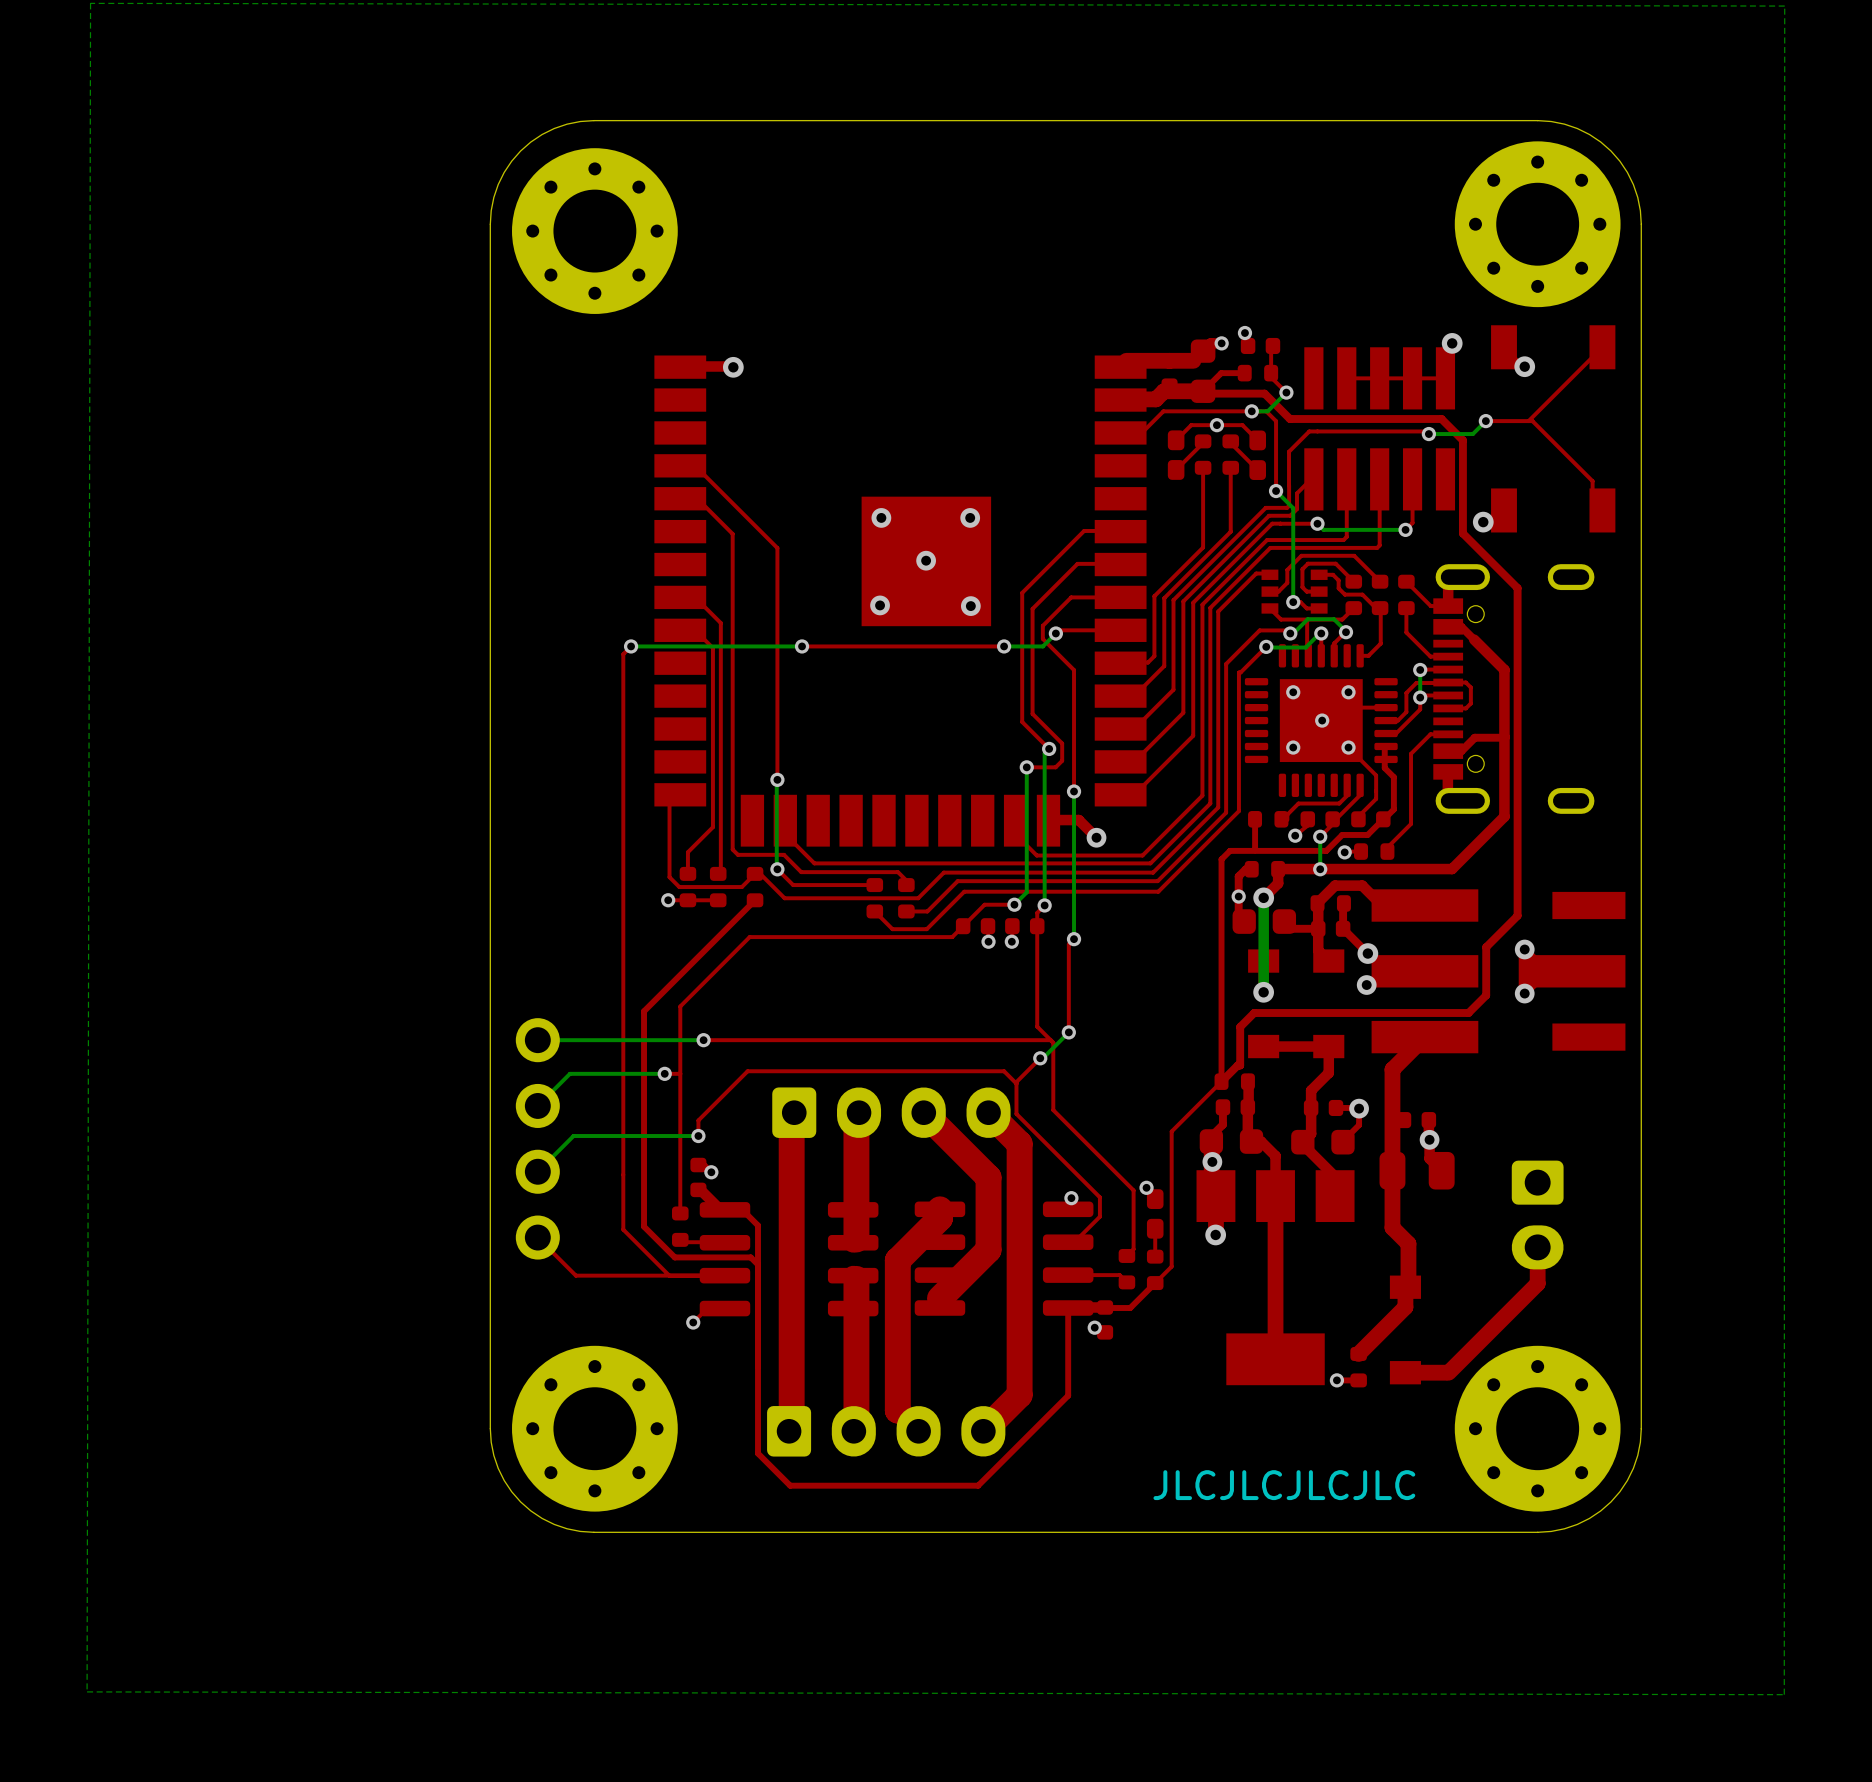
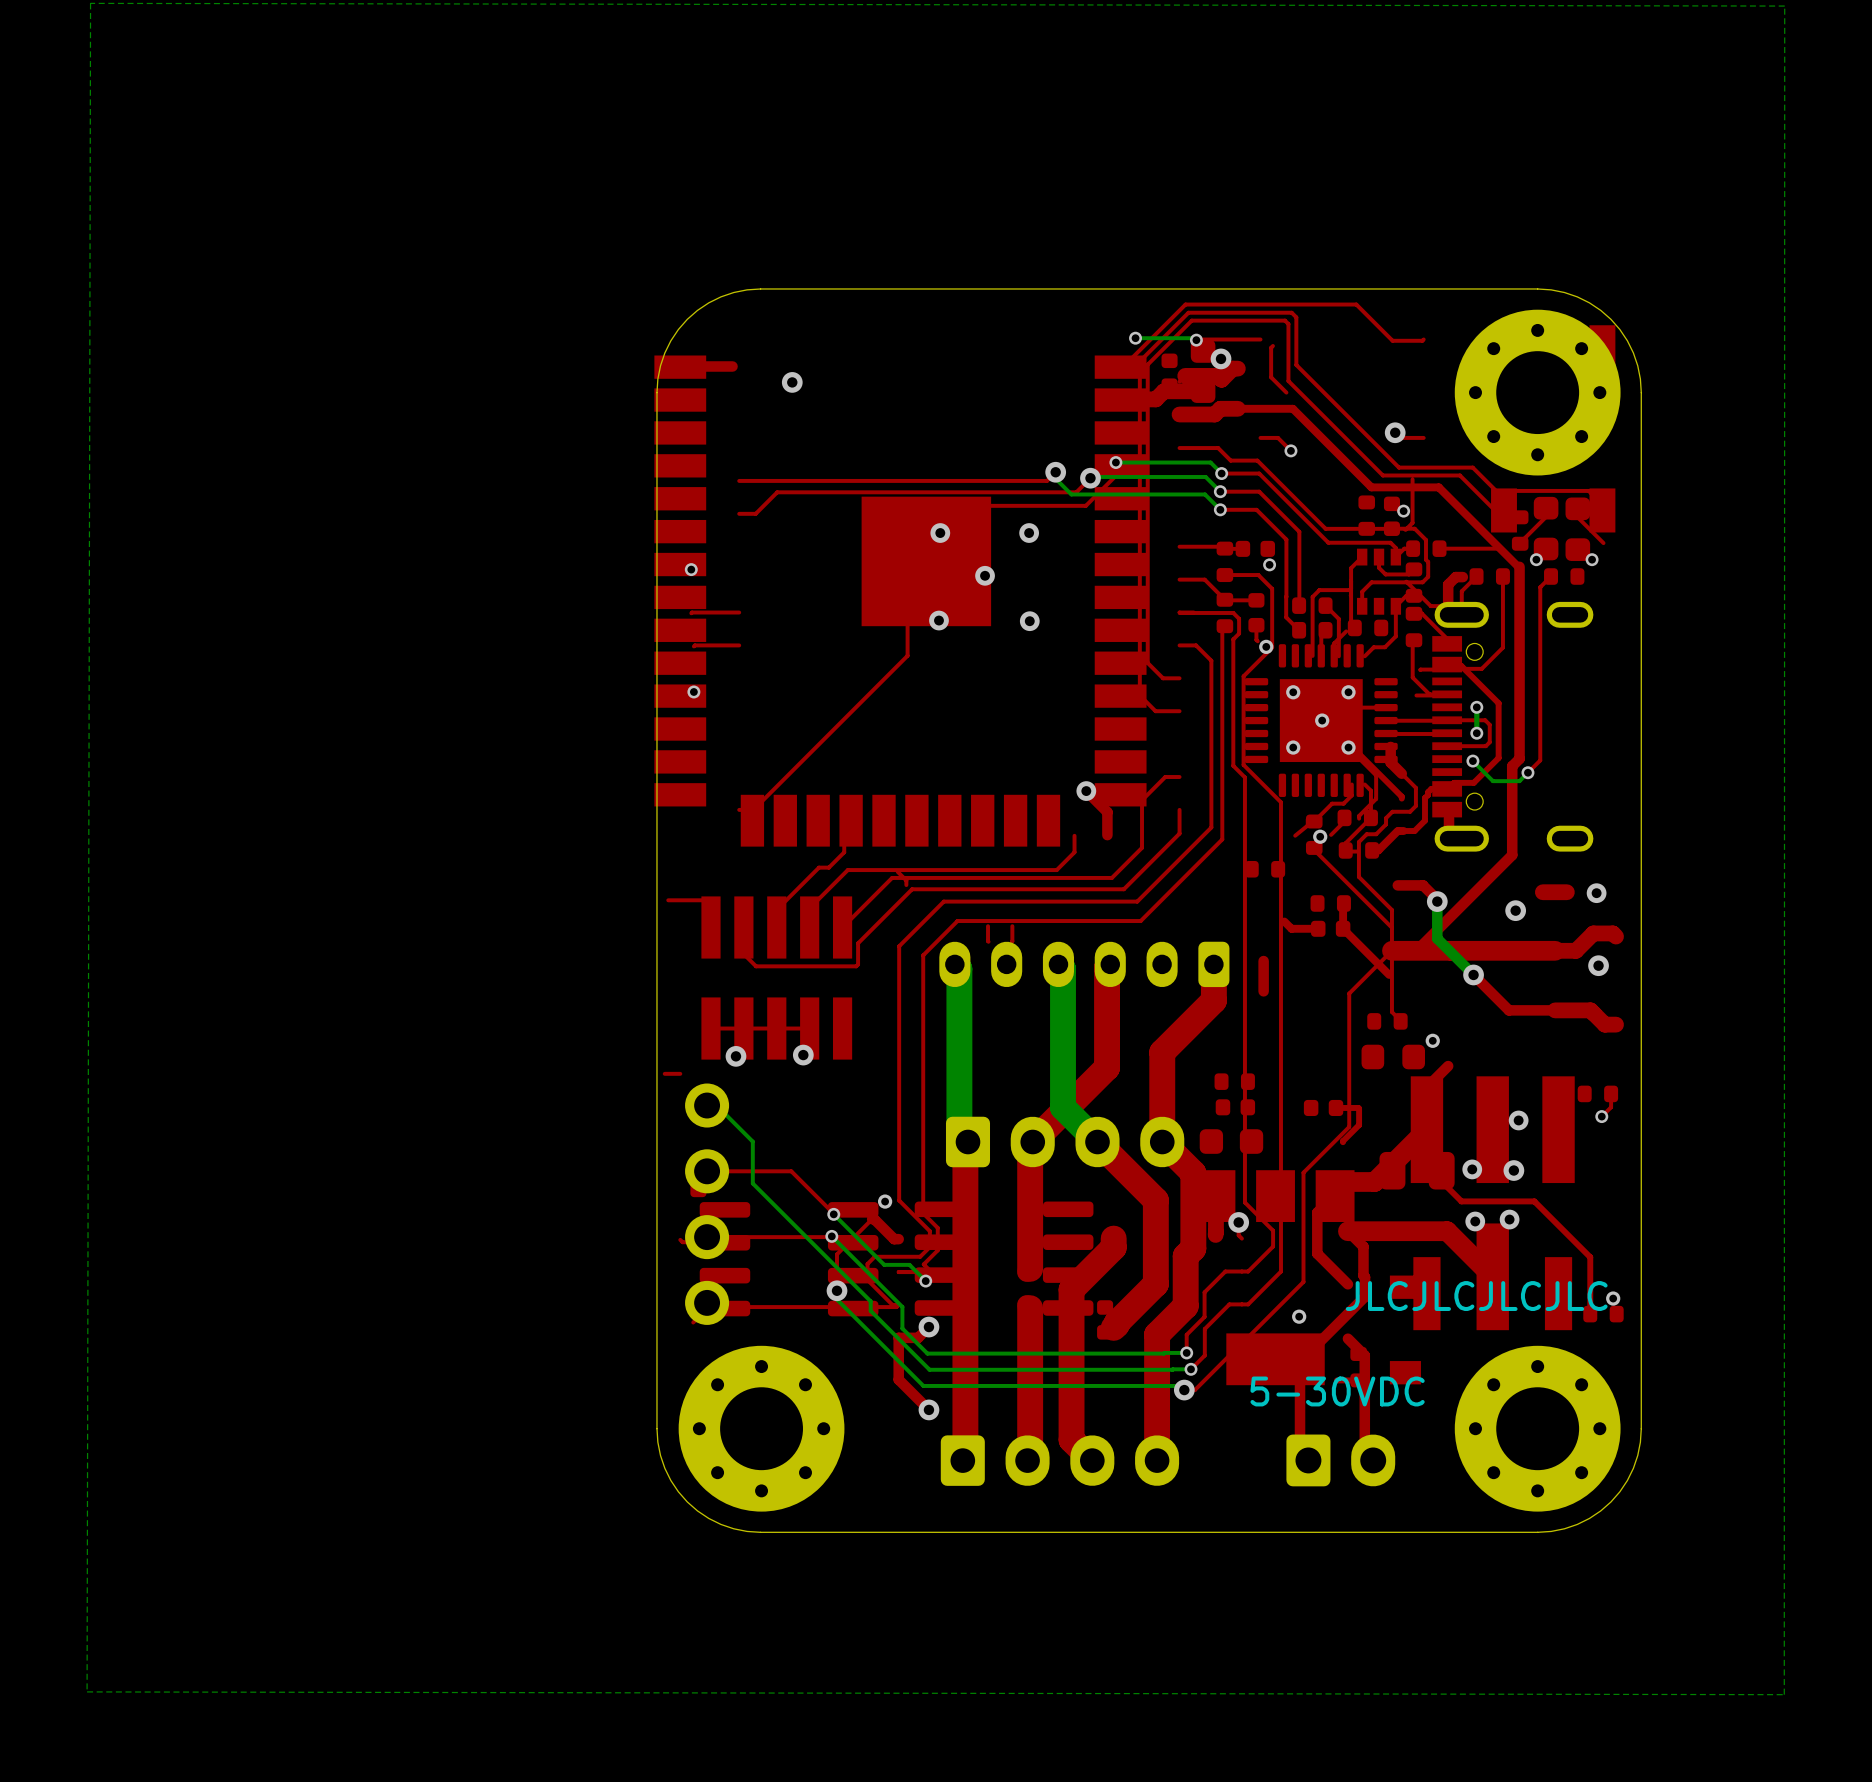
part position: (1537, 224) -> (1537, 392)
part: (594, 231) -> none
via: (1244, 333) -> none
bottom track: none -> (1135, 338) (1194, 338) (1196, 340)
via: none -> (1135, 338)
top track: none -> (1260, 339) (1196, 340)
top track: none -> (1423, 339) (1392, 340) (1356, 304) (1185, 304) (1131, 358)
via: none -> (1196, 340)
top track: (1221, 343) (1210, 343) (1193, 360) (1126, 360) (1120, 366) -> none
via position: (1221, 343) -> (1221, 358)
via: (1452, 343) -> none
part: (1260, 345) -> none
top track: (1602, 347) (1528, 421) -> none
top track: none -> (1221, 358) (1230, 368) (1237, 368) (1232, 368) (1221, 379) (1217, 375) (1185, 375) (1179, 381)
via: (1524, 366) -> none
via position: (733, 367) -> (792, 382)
top track: (1244, 373) (1221, 373) (1203, 391) -> none
part: (1257, 373) -> none
top track: (1445, 378) (1346, 378) -> none
top track: (1203, 391) (1205, 393) (1264, 393) (1289, 418) (1441, 418) (1462, 440) (1462, 533) (1517, 588) (1517, 915) (1486, 947) (1486, 995) (1468, 1013) (1254, 1013) (1240, 1026) (1240, 1065) (1237, 1065) (1171, 1131) (1171, 1266) (1130, 1308) (1068, 1308) (1068, 1395) (978, 1485) (790, 1485) (758, 1453) (758, 1225) (742, 1209) (720, 1209) (698, 1189) -> none
bottom track: (1286, 392) (1267, 411) (1251, 411) -> none
via: (1286, 392) -> none
board edge: (1641, 392) (1641, 224) (1637, 197) (1627, 172) (1610, 150) (1589, 134) (1564, 124) (1537, 120) (593, 120) (567, 124) (542, 134) (520, 150) (511, 161) (498, 184) (493, 197) (490, 224) (491, 1442) (498, 1468) (511, 1491) (530, 1510) (554, 1524) (567, 1528) (593, 1532) (760, 1532) -> (1641, 392) (1640, 379) (1633, 352) (1619, 329) (1610, 319) (1589, 302) (1577, 296) (1564, 292) (1537, 288) (760, 288) (733, 292) (708, 302) (687, 319) (678, 329) (664, 352) (660, 365) (656, 392) (657, 1442) (660, 1455) (670, 1480) (687, 1501) (708, 1518) (720, 1524) (747, 1531) (760, 1532)
via: (1251, 411) -> none
top track: none -> (1179, 414) (1214, 414) (1220, 408) (1292, 408) (1371, 487) (1438, 487) (1519, 566) (1519, 758) (1512, 766) (1512, 855) (1416, 950) (1391, 950)
top track: (1485, 421) (1532, 421) (1592, 481) (1592, 515) -> none
bottom track: (1485, 421) (1472, 434) (1428, 434) -> none
via: (1485, 421) -> none
via: (1216, 425) -> none
part: (1379, 428) -> none
top track: (1140, 432) (1142, 432) (1163, 411) (1266, 411) (1276, 421) (1276, 491) -> none
top track: none -> (1395, 432) (1400, 437) (1423, 437)
via: none -> (1395, 432)
top track: (1428, 434) (1426, 431) (1309, 431) (1289, 451) (1289, 505) (1287, 507) (1265, 507) (1173, 600) (1173, 689) (1134, 728) (1120, 728) -> none
via: (1428, 434) -> none
top track: none -> (1260, 437) (1278, 437) (1290, 450)
top track: (1176, 440) (1191, 425) (1242, 425) (1257, 440) -> none
top track: (1203, 441) (1176, 469) -> none
top track: (1230, 441) (1257, 470) -> none
top track: none -> (1179, 448) (1218, 448) (1230, 460) (1257, 460) (1325, 528) (1414, 528) (1425, 539) (1428, 576) (1422, 582) (1371, 582) (1362, 591) (1362, 606)
via: none -> (1290, 450)
part: (1203, 454) -> none
part: (1230, 454) -> none
part: (1176, 455) -> none
part: (1257, 455) -> none
top track: none -> (1115, 462) (1115, 475) (1085, 505) (917, 505) (907, 515) (907, 655) (753, 809) (739, 809)
bottom track: none -> (1115, 462) (1210, 462) (1221, 473)
via: none -> (1115, 462)
top track: (680, 465) (694, 465) (777, 548) (777, 779) -> none
top track: (1203, 467) (1203, 547) (1154, 596) (1154, 656) (1148, 662) (1120, 662) -> none
top track: (1230, 467) (1230, 531) (1164, 598) (1164, 666) (1134, 695) (1120, 695) -> none
top track: none -> (1055, 472) (1047, 480) (739, 480)
bottom track: none -> (1055, 472) (1055, 478) (1071, 494) (1205, 494) (1220, 509)
via: none -> (1055, 472)
top track: none -> (1221, 473) (1259, 473) (1328, 542) (1390, 542) (1395, 548) (1395, 557) (1404, 548) (1413, 548)
via: none -> (1221, 473)
top track: none -> (1090, 478) (1076, 492) (777, 492) (755, 513) (739, 513)
bottom track: none -> (1090, 478) (1205, 476) (1220, 491)
via: none -> (1090, 478)
top track: (1313, 479) (1311, 479) (1296, 493) (1296, 509) (1290, 515) (1269, 515) (1183, 601) (1183, 712) (1134, 761) (1120, 761) -> none
top track: (1346, 479) (1346, 536) (1343, 540) (1267, 540) (1202, 604) (1202, 795) (1142, 855) (1036, 855) (1015, 834) (1015, 820) -> none
top track: (1379, 479) (1379, 545) (1377, 547) (1270, 547) (1210, 607) (1210, 803) (1150, 863) (814, 863) (785, 834) (785, 820) -> none
top track: none -> (1220, 491) (1259, 491) (1299, 531) (1299, 605)
via: none -> (1220, 491)
bottom track: (1276, 491) (1293, 508) (1293, 602) -> none
via: (1276, 491) -> none
top track: (680, 498) (696, 498) (732, 533) (732, 849) (737, 854) (784, 854) (801, 872) (897, 872) -> none
top track: none -> (1577, 508) (1577, 517) (1603, 543)
top track: none -> (1220, 509) (1256, 509) (1286, 539) (1286, 596)
via: none -> (1220, 509)
via: none -> (1403, 511)
top track: none -> (1552, 514) (1548, 514) (1525, 537) (1525, 541)
part: none -> (1366, 515)
part: none -> (1391, 516)
top track: none -> (1603, 516) (1596, 509) (1596, 498) (1588, 490) (1496, 490) (1472, 467) (1398, 467) (1296, 364) (1296, 317) (1291, 312) (1188, 312) (1139, 361) (1139, 695) (1155, 711) (1179, 711)
via: (881, 517) -> none
via: (970, 517) -> none
top track: none -> (1520, 517) (1501, 517) (1459, 475) (1382, 475) (1288, 381) (1288, 324) (1285, 320) (1191, 320) (1147, 364) (1147, 663) (1163, 678) (1179, 678)
via: (1483, 522) -> none
top track: (1317, 523) (1272, 523) (1193, 602) (1193, 735) (1134, 794) (1120, 794) -> none
bottom track: (1317, 523) (1323, 529) (1405, 529) -> none
via: (1317, 523) -> none
part: none -> (1546, 528)
via: (1405, 529) -> none
part: none -> (1577, 529)
top track: (1120, 530) (1084, 530) (1022, 592) (1022, 721) (1049, 748) -> none
part: none -> (1520, 530)
via: none -> (940, 533)
via: none -> (1029, 533)
top track: none -> (1179, 546) (1242, 548)
part: none -> (1255, 548)
part: none -> (1426, 548)
top track: none -> (1439, 548) (1501, 548)
top track: none -> (1362, 557) (1351, 568) (1351, 624) (1354, 627)
top track: none -> (1379, 557) (1379, 567) (1385, 574) (1408, 574) (1413, 569)
via: none -> (1536, 559)
via: none -> (1592, 559)
via: (926, 560) -> none
part: none -> (1224, 561)
top track: (1120, 563) (1077, 563) (1032, 608) (1032, 713) (1062, 743) (1062, 760) (1055, 767) (1026, 767) -> none
via: none -> (1269, 564)
via: none -> (691, 569)
top track: (1268, 573) (1256, 573) (1218, 611) (1218, 807) (1153, 872) (943, 872) (918, 898) (784, 898) (760, 873) (755, 873) (741, 887) (679, 887) (669, 877) (669, 804) (680, 794) -> none
top track: (1319, 574) (1332, 574) (1338, 580) (1338, 588) (1344, 594) (1362, 594) (1375, 608) (1380, 608) (1380, 643) (1368, 655) (1360, 655) -> none
part footprint: [1371, 574, 1389, 616] -> [1357, 548, 1402, 615]
via: none -> (985, 575)
top track: none -> (1224, 575) (1258, 575) (1272, 588) (1272, 647) (1243, 676) (1243, 764) (1280, 802) (1280, 1271) (1248, 1304) (1229, 1304) (1204, 1328) (1204, 1355) (1191, 1369)
top track: none -> (1476, 576) (1461, 591) (1461, 614)
part: none -> (1489, 576)
top track: none -> (1502, 576) (1502, 647) (1481, 668) (1451, 668) (1447, 664)
top track: none -> (1551, 576) (1540, 587) (1540, 760) (1527, 772)
part: none -> (1564, 576)
top track: none -> (1179, 579) (1204, 579) (1225, 600) (1256, 600)
top track: (1353, 581) (1335, 563) (1308, 563) (1302, 569) (1302, 587) (1306, 591) (1319, 591) -> none
top track: (1380, 581) (1354, 555) (1301, 555) (1287, 569) (1287, 582) (1278, 591) (1269, 591) -> none
top track: none -> (1351, 588) (1319, 590) (1312, 596) (1312, 655)
part: (1294, 591) -> none
part: (1353, 594) -> none
part position: (1406, 594) -> (1413, 582)
top track: none -> (1413, 595) (1406, 595) (1395, 606) (1395, 636) (1384, 647) (1373, 647) (1364, 656)
top track: (680, 596) (694, 596) (720, 623) (720, 871) (718, 873) -> none
top track: none -> (1286, 596) (1286, 617) (1299, 630)
top track: (1120, 597) (1071, 597) (1042, 625) (1042, 638) (1074, 670) (1074, 791) -> none
top track: (1293, 602) (1300, 602) (1306, 608) (1319, 608) -> none
via: (1293, 602) -> none
via: (880, 605) -> none
part: none -> (1312, 605)
top track: none -> (1325, 605) (1338, 618) (1338, 656)
via: (970, 606) -> none
top track: (1353, 608) (1342, 619) (1281, 619) (1269, 608) -> none
top track: (1406, 608) (1406, 632) (1430, 656) (1448, 656) -> none
top track: none -> (739, 612) (691, 613)
top track: none -> (1193, 612) (1179, 612) (1233, 612) (1239, 618) (1239, 633) (1233, 639) (1233, 765) (1244, 777) (1244, 1202) (1273, 1230) (1273, 1246) (1248, 1271) (1225, 1271) (1204, 1292) (1204, 1316) (1186, 1334) (1186, 1352)
part: none -> (1224, 612)
part: none -> (1256, 612)
top track: none -> (1409, 613) (1421, 613) (1447, 638) (1447, 643)
via: none -> (938, 620)
via: none -> (1029, 621)
top track: (1307, 621) (1308, 655) -> none
top track: none -> (1256, 625) (1257, 641)
top track: none -> (1224, 626) (1222, 628) (1222, 839) (1140, 921) (957, 921) (923, 955) (923, 1213) (937, 1227) (937, 1250) (923, 1264) (931, 1272) (898, 1272)
top track: (1448, 626) (1461, 626) (1504, 669) (1504, 816) (1452, 869) (1281, 869) -> none
part: none -> (1368, 627)
part: none -> (1413, 627)
top track: (680, 629) (694, 629) (712, 648) (712, 827) (687, 852) (687, 873) -> none
top track: (1120, 630) (1059, 630) (1055, 633) -> none
top track: (1291, 630) (1259, 630) (1226, 663) (1226, 812) (1211, 827) -> (1179, 645) (1196, 645) (1211, 660) (1211, 827)
part: none -> (1312, 630)
bottom track: (1346, 631) (1334, 619) (1307, 619) (1294, 632) (1291, 632) -> none
bottom track: (1321, 632) (1305, 647) (1266, 646) -> none
via: (1345, 632) -> none
bottom track: (1055, 633) (1042, 646) (1004, 646) -> none
via: (1055, 633) -> none
via: (1290, 633) -> none
via: (1321, 633) -> none
top track: none -> (1408, 640) (1412, 644) (1412, 677) (1429, 694) (1447, 694)
top track: none -> (739, 645) (693, 646)
top track: (631, 646) (623, 654) (623, 1229) (669, 1275) -> none
via: (631, 646) -> none
bottom track: (802, 646) (631, 646) -> none
via: (802, 646) -> none
top track: (1004, 646) (802, 646) -> none
via: (1004, 646) -> none
top track: (1266, 646) (1238, 672) (1238, 811) (1158, 891) (964, 891) (926, 929) (892, 929) (874, 911) -> none
top track: none -> (1449, 665) (1461, 665) (1498, 703) (1498, 758) (1473, 782) (1454, 782) (1448, 788)
bottom track: (1420, 669) (1420, 697) -> none
via: (1420, 669) -> none
top track: (1448, 682) (1465, 682) (1470, 687) (1470, 703) (1465, 708) (1448, 708) -> none
top track: (1453, 683) (1416, 683) (1406, 692) (1406, 712) (1397, 720) (1386, 720) -> none
part position: (1513, 688) -> (1512, 726)
via: none -> (693, 691)
top track: (1420, 697) (1420, 709) (1396, 733) (1386, 733) -> none
via: (1420, 697) -> none
bottom track: none -> (1476, 707) (1476, 733)
via: none -> (1476, 707)
top track: none -> (1447, 720) (1485, 720) (1489, 724) (1489, 742) (1485, 746) (1447, 746)
top track: none -> (1457, 720) (1390, 720)
via: none -> (1476, 733)
top track: (1448, 734) (1430, 734) (1411, 753) (1411, 823) (1383, 851) -> none
top track: none -> (1452, 734) (1390, 734)
top track: (1504, 737) (1474, 737) (1461, 751) (1448, 751) -> none
top track: (1384, 746) (1384, 768) (1393, 777) (1393, 809) (1384, 819) -> none
top track: none -> (1390, 746) (1390, 762) (1415, 787) (1415, 805) (1410, 811) (1392, 811) (1386, 818) (1386, 824) (1376, 834) (1366, 834) (1358, 842) (1358, 876) (1391, 910) (1391, 1012) (1400, 1020)
bottom track: (1049, 748) (1044, 753) (1044, 905) -> none
via: (1049, 748) -> none
top track: none -> (1353, 748) (1401, 798)
bottom track: none -> (1472, 761) (1492, 781) (1519, 781) (1527, 772)
via: none -> (1472, 761)
bottom track: (1026, 767) (1026, 892) (1014, 904) -> none
via: (1026, 767) -> none
via: none -> (1527, 772)
top track: none -> (1179, 777) (1165, 777) (1142, 800) (1142, 847) (1111, 877) (892, 877) (842, 927)
bottom track: (777, 779) (777, 869) -> none
via: (777, 779) -> none
top track: (1447, 779) (1447, 791) -> (1449, 818) (1449, 830)
top track: (1347, 784) (1347, 795) (1339, 803) (1298, 803) (1287, 814) (1287, 819) -> none
top track: none -> (1351, 784) (1351, 795) (1343, 803) (1332, 803) (1314, 821)
top track: (1360, 784) (1360, 795) (1336, 819) (1332, 819) (1332, 824) (1320, 836) -> none
top track: none -> (1364, 784) (1370, 790) (1370, 817) (1345, 843) (1345, 850)
top track: none -> (1447, 788) (1431, 788) (1428, 792) (1424, 798) (1424, 820) (1414, 831) (1398, 831)
bottom track: (1074, 791) (1074, 939) -> none
via: (1074, 791) -> none
top track: none -> (1086, 791) (1107, 812) (1107, 835)
top track: none -> (1179, 809) (1179, 833) (1123, 889) (912, 889) (858, 943) (858, 964) (856, 966) (756, 966) (743, 954)
part footprint: [1300, 811, 1340, 828] -> [1305, 814, 1323, 855]
part footprint: [1351, 811, 1391, 828] -> [1337, 809, 1378, 827]
top track: none -> (1344, 817) (1344, 821) (1331, 834)
top track: (1255, 819) (1255, 850) -> none
part: (1268, 819) -> none
top track: (1383, 819) (1367, 834) (1342, 834) (1326, 850) (1230, 850) (1221, 859) (1221, 1081) -> none
top track: (1048, 820) (1078, 820) (1096, 837) -> none
top track: none -> (1397, 831) (1378, 850) (1372, 850)
top track: none -> (844, 835) (844, 852) (828, 867) (818, 867) (776, 909) (776, 927)
top track: none -> (1074, 835) (1074, 852) (1056, 870) (847, 870) (809, 908) (809, 927)
via: (1295, 835) -> none
bottom track: (1320, 836) (1320, 869) -> none
via position: (1096, 837) -> (1086, 791)
top track: none -> (1314, 847) (1391, 927)
part position: (1374, 851) -> (1358, 850)
via: (1344, 852) -> none
top track: (777, 869) (793, 885) (874, 885) -> none
via: (777, 869) -> none
top track: (1251, 869) (1245, 869) (1238, 876) (1238, 916) (1244, 921) -> none
top track: (1278, 869) (1278, 883) (1263, 897) -> none
via: (1320, 869) -> none
top track: (1157, 881) (957, 881) (927, 911) (906, 911) -> (1157, 881) (1137, 901) (943, 901) (899, 946) (899, 1200) (929, 1231) (929, 1247) (920, 1256) (874, 1256) (867, 1263) (867, 1280) (892, 1304) (898, 1304) (896, 1307) (711, 1307) (707, 1302)
top track: none -> (1397, 885) (1423, 885) (1437, 901)
part: (687, 887) -> none
part: (718, 887) -> none
part: (755, 887) -> none
top track: none -> (1566, 892) (1542, 892)
via: none -> (1596, 893)
via: (1238, 896) -> none
bottom track: (1263, 897) (1263, 991) -> none
via: (1263, 897) -> none
part: (874, 898) -> none
part: (906, 898) -> none
via: (668, 900) -> none
top track: (755, 900) (644, 1011) (644, 1226) (674, 1257) (750, 1257) (758, 1264) -> none
bottom track: none -> (1437, 901) (1437, 938) (1473, 974)
via: none -> (1437, 901)
top track: (1014, 904) (984, 904) (952, 937) (749, 937) (680, 1006) (680, 1213) -> none
via: (1014, 904) -> none
top track: (1044, 905) (1037, 912) (1037, 1026) (1053, 1042) (1053, 1110) (1133, 1190) (1133, 1249) (1126, 1255) -> none
via: (1044, 905) -> none
top track: (1424, 905) (1382, 905) (1362, 885) (1335, 885) (1317, 903) (1318, 950) (1328, 961) -> none
via: none -> (1515, 910)
part: (1264, 921) -> none
part: (975, 926) -> none
part: (1024, 926) -> none
top track: none -> (1616, 936) (1612, 933) (1593, 933) (1576, 950) (1391, 950)
top track: (1074, 939) (1068, 944) (1068, 1032) -> none
via: (1074, 939) -> none
via: (988, 941) -> none
via: (1011, 941) -> none
via: (1524, 949) -> none
top track: none -> (1391, 950) (1349, 993) (1349, 1126) (1303, 1172) (1303, 1281) (1248, 1337) (1241, 1337) (1241, 1343) (1194, 1390) (1184, 1390)
via: (1367, 953) -> none
bottom track: none -> (954, 964) (959, 968) (959, 1133) (967, 1142)
bottom track: none -> (1058, 964) (1063, 968) (1063, 1107) (1097, 1142)
part: none -> (1084, 964)
top track: none -> (1110, 964) (1107, 967) (1107, 1067) (1032, 1142)
top track: none -> (1213, 964) (1213, 1000) (1162, 1052) (1162, 1142) (1193, 1173) (1193, 1248) (1185, 1256) (1185, 1306) (1157, 1334) (1157, 1460)
via: none -> (1598, 965)
part rotation: 0° (1498, 971) -> 90° clockwise (1492, 1203)
part position: (1498, 971) -> (1492, 1203)
top track: none -> (1473, 974) (1508, 1010) (1590, 1010) (1604, 1024) (1616, 1024)
via: none -> (1473, 974)
part: none -> (776, 978)
via: (1366, 985) -> none
via: (1263, 992) -> none
via: (1524, 993) -> none
part: (1263, 1003) -> none
part: (1328, 1003) -> none
part: none -> (1387, 1021)
top track: none -> (809, 1028) (710, 1028)
bottom track: (1068, 1032) (1042, 1058) (1040, 1058) -> none
via: (1068, 1032) -> none
top track: (1424, 1037) (1392, 1069) (1392, 1227) (1408, 1243) (1408, 1287) -> none
bottom track: (703, 1040) (537, 1040) -> none
via: (703, 1040) -> none
top track: (1050, 1040) (703, 1040) -> none
via: none -> (1432, 1040)
top track: (1263, 1046) (1328, 1046) (1328, 1072) (1311, 1090) (1311, 1133) (1302, 1144) (1335, 1176) (1335, 1196) -> none
via: none -> (803, 1055)
via: none -> (735, 1056)
part: none -> (1393, 1057)
top track: (1040, 1058) (1016, 1082) (1016, 1113) (1099, 1197) (1099, 1216) (1074, 1242) (1068, 1242) -> none
via: (1040, 1058) -> none
top track: none -> (1448, 1066) (1426, 1087) (1426, 1129) (1374, 1181) (1347, 1181) (1317, 1212) (1317, 1253) (1347, 1284)
bottom track: (664, 1073) (569, 1073) (537, 1105) -> none
via: (664, 1073) -> none
top track: (1248, 1079) (1247, 1137) (1251, 1141) (1261, 1141) (1275, 1156) (1275, 1359) -> none
top track: (1016, 1083) (1004, 1071) (747, 1071) (698, 1120) (698, 1136) -> none
part: none -> (1597, 1093)
top track: none -> (1611, 1093) (1611, 1107) (1601, 1116)
bottom track: none -> (707, 1105) (716, 1105) (752, 1141) (752, 1183) (870, 1301) (870, 1310) (929, 1369) (1191, 1369)
top track: (1222, 1107) (1222, 1124) (1213, 1134) -> none
via: (1359, 1108) -> none
top track: (794, 1112) (791, 1115) (791, 1428) (789, 1431) -> (967, 1142) (965, 1144) (965, 1458) (962, 1460)
part: (891, 1112) -> none
top track: (923, 1112) (988, 1177) (988, 1249) (939, 1298) -> none
top track: (988, 1112) (1019, 1143) (1019, 1395) (983, 1431) -> none
top track: (856, 1115) (856, 1239) (853, 1242) -> (1030, 1144) (1030, 1268) (1026, 1272)
via: none -> (1601, 1116)
part: (1416, 1120) -> none
via: none -> (1518, 1120)
bottom track: (698, 1136) (573, 1136) (537, 1171) -> none
via: (698, 1136) -> none
part position: (537, 1138) -> (707, 1204)
via: (1429, 1139) -> none
part: none -> (1065, 1142)
top track: none -> (1097, 1142) (1155, 1200) (1155, 1284) (1113, 1327)
part: (1322, 1142) -> none
via: (1212, 1161) -> none
top track: none -> (1426, 1166) (1461, 1201) (1534, 1201) (1590, 1257) (1590, 1314)
via: none -> (1472, 1169)
via: none -> (1513, 1170)
top track: none -> (707, 1171) (791, 1171) (833, 1214)
via: (711, 1172) -> none
via: (1146, 1187) -> none
via: (1071, 1198) -> none
via: none -> (885, 1201)
top track: (939, 1209) (939, 1218) (897, 1260) (897, 1410) (918, 1431) -> (1113, 1238) (1113, 1247) (1071, 1289) (1071, 1439) (1092, 1460)
part: (1155, 1213) -> none
bottom track: none -> (833, 1214) (884, 1264) (909, 1264) (925, 1281)
via: none -> (833, 1214)
part rotation: 0° (1537, 1215) -> 90° counterclockwise (1340, 1460)
part position: (1537, 1215) -> (1340, 1460)
via: none -> (1509, 1219)
via: none -> (1475, 1221)
top track: none -> (1238, 1222) (1238, 1235) (1241, 1238)
part: (680, 1226) -> none
via position: (1215, 1234) -> (1238, 1222)
top track: none -> (831, 1236) (707, 1237)
bottom track: none -> (831, 1236) (902, 1306) (902, 1328) (927, 1353) (1186, 1352)
via: none -> (831, 1236)
top track: (537, 1237) (575, 1275) (724, 1275) -> none
top track: none -> (898, 1239) (894, 1239) (872, 1219) (837, 1254) (837, 1290)
top track: (1537, 1247) (1537, 1283) (1448, 1372) -> none
part: (1126, 1269) -> none
part: (1155, 1269) -> none
top track: (853, 1275) (856, 1278) (856, 1428) (853, 1431) -> (1026, 1304) (1030, 1308) (1030, 1458) (1027, 1460)
top track: (1068, 1275) (1119, 1275) (1126, 1282) -> none
via: none -> (925, 1281)
top track: (1405, 1287) (1405, 1307) (1358, 1353) -> none
bottom track: none -> (837, 1290) (837, 1299) (923, 1385) (1180, 1385) (1184, 1390)
via: none -> (837, 1290)
via: none -> (1613, 1298)
top track: none -> (1492, 1302) (1492, 1276) (1447, 1231) (1347, 1231) (1363, 1246) (1365, 1296) (1300, 1361) (1300, 1452) (1308, 1460)
part: none -> (1603, 1314)
via: (693, 1322) -> none
top track: none -> (928, 1327) (918, 1337) (898, 1337) (898, 1379) (928, 1409)
via: none -> (928, 1327)
via: (1094, 1327) -> none
top track: none -> (1347, 1338) (1364, 1355) (1364, 1452) (1373, 1460)
via: none -> (1186, 1352)
via: none -> (1191, 1369)
top track: (1445, 1372) (1405, 1372) -> none
via position: (1336, 1380) -> (1299, 1316)
via: none -> (1184, 1390)
text: none -> 5-30VDC (1337, 1391)
via: none -> (928, 1409)
part position: (594, 1428) -> (761, 1428)
part: (886, 1431) -> none
part: none -> (1059, 1460)
text position: JLCJLCJLCJLC (1284, 1485) -> JLCJLCJLCJLC (1476, 1296)

